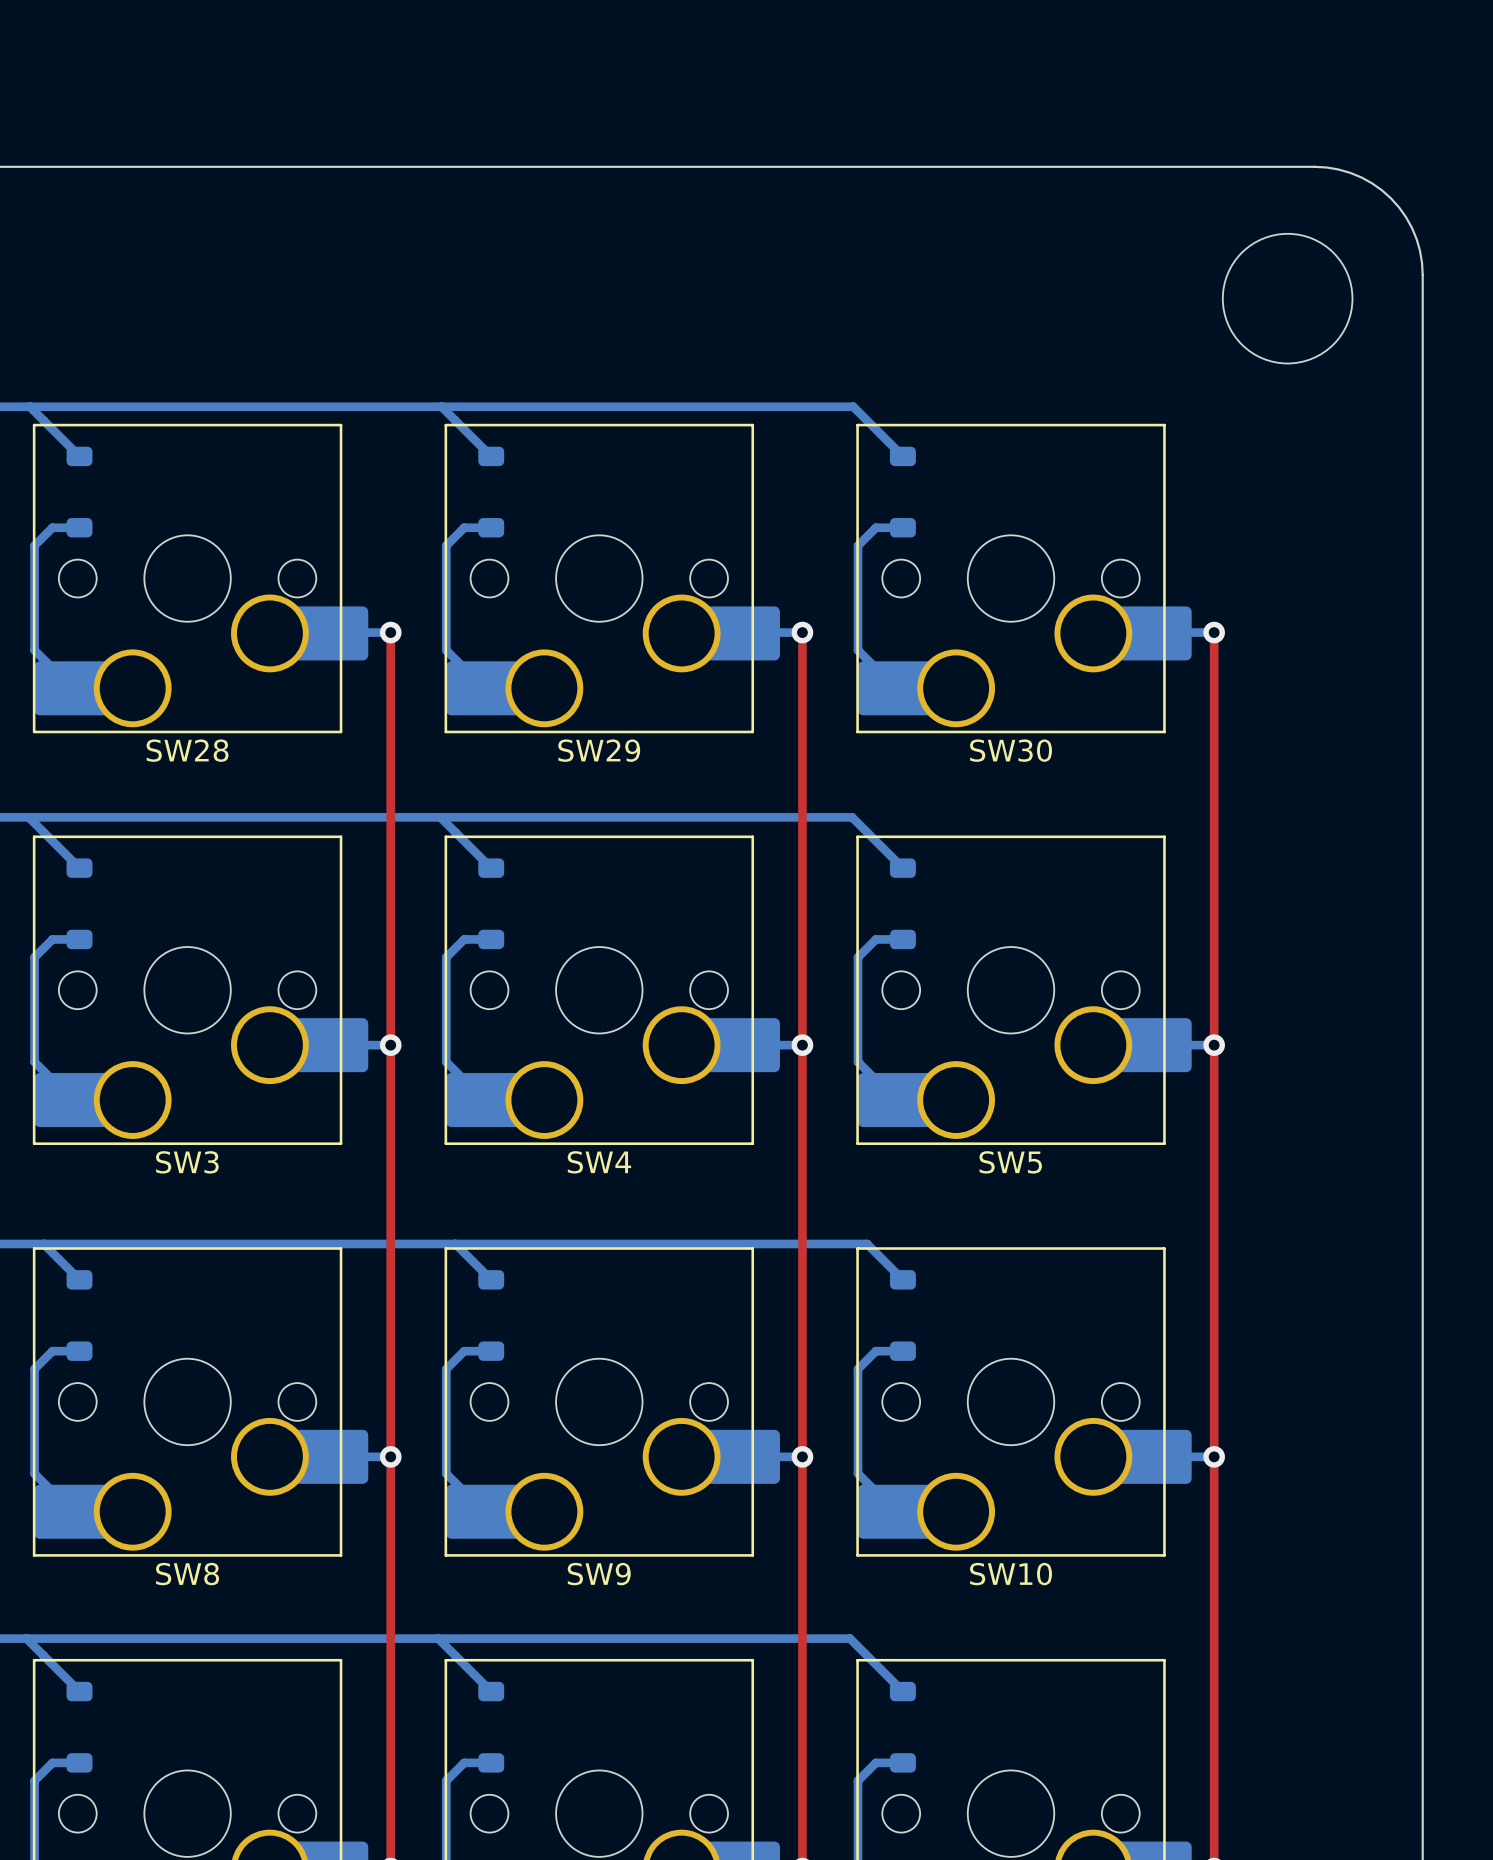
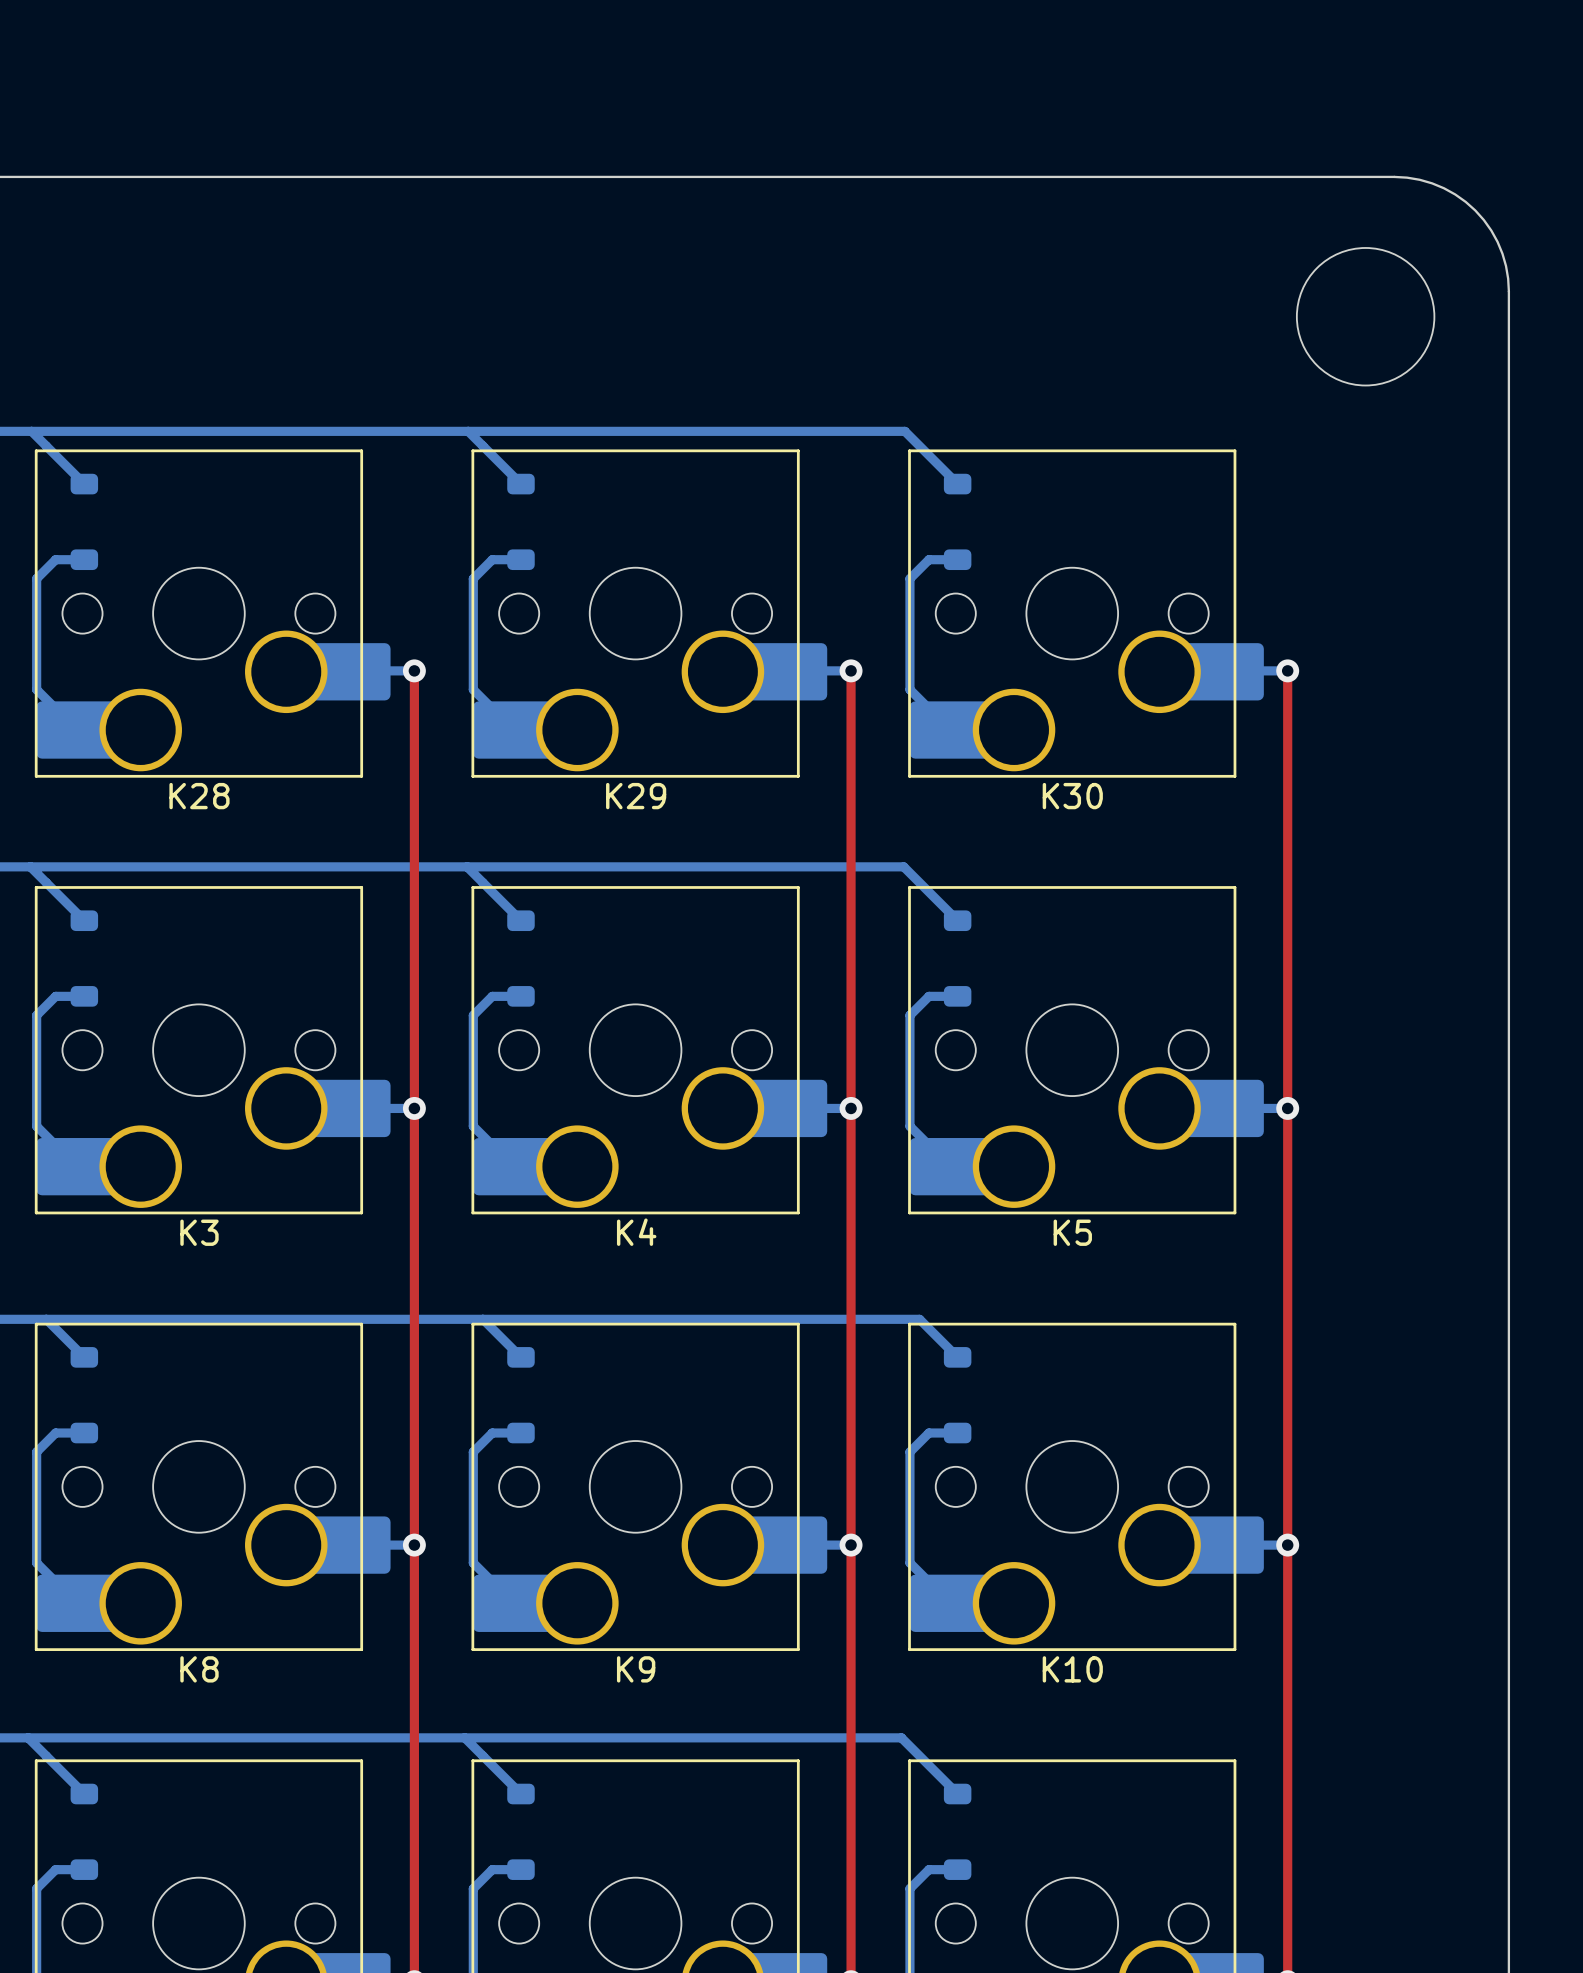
SW28 name: SW28 (187, 750) -> K28 (199, 796)
SW29 name: SW29 (599, 750) -> K29 (636, 796)
SW30 name: SW30 (1011, 750) -> K30 (1072, 796)
SW3 name: SW3 (187, 1162) -> K3 (199, 1232)
SW4 name: SW4 (599, 1162) -> K4 (636, 1232)
SW5 name: SW5 (1010, 1162) -> K5 (1072, 1232)
SW8 name: SW8 (187, 1574) -> K8 (199, 1669)
SW9 name: SW9 (599, 1574) -> K9 (636, 1669)
SW10 name: SW10 (1011, 1574) -> K10 (1072, 1669)

